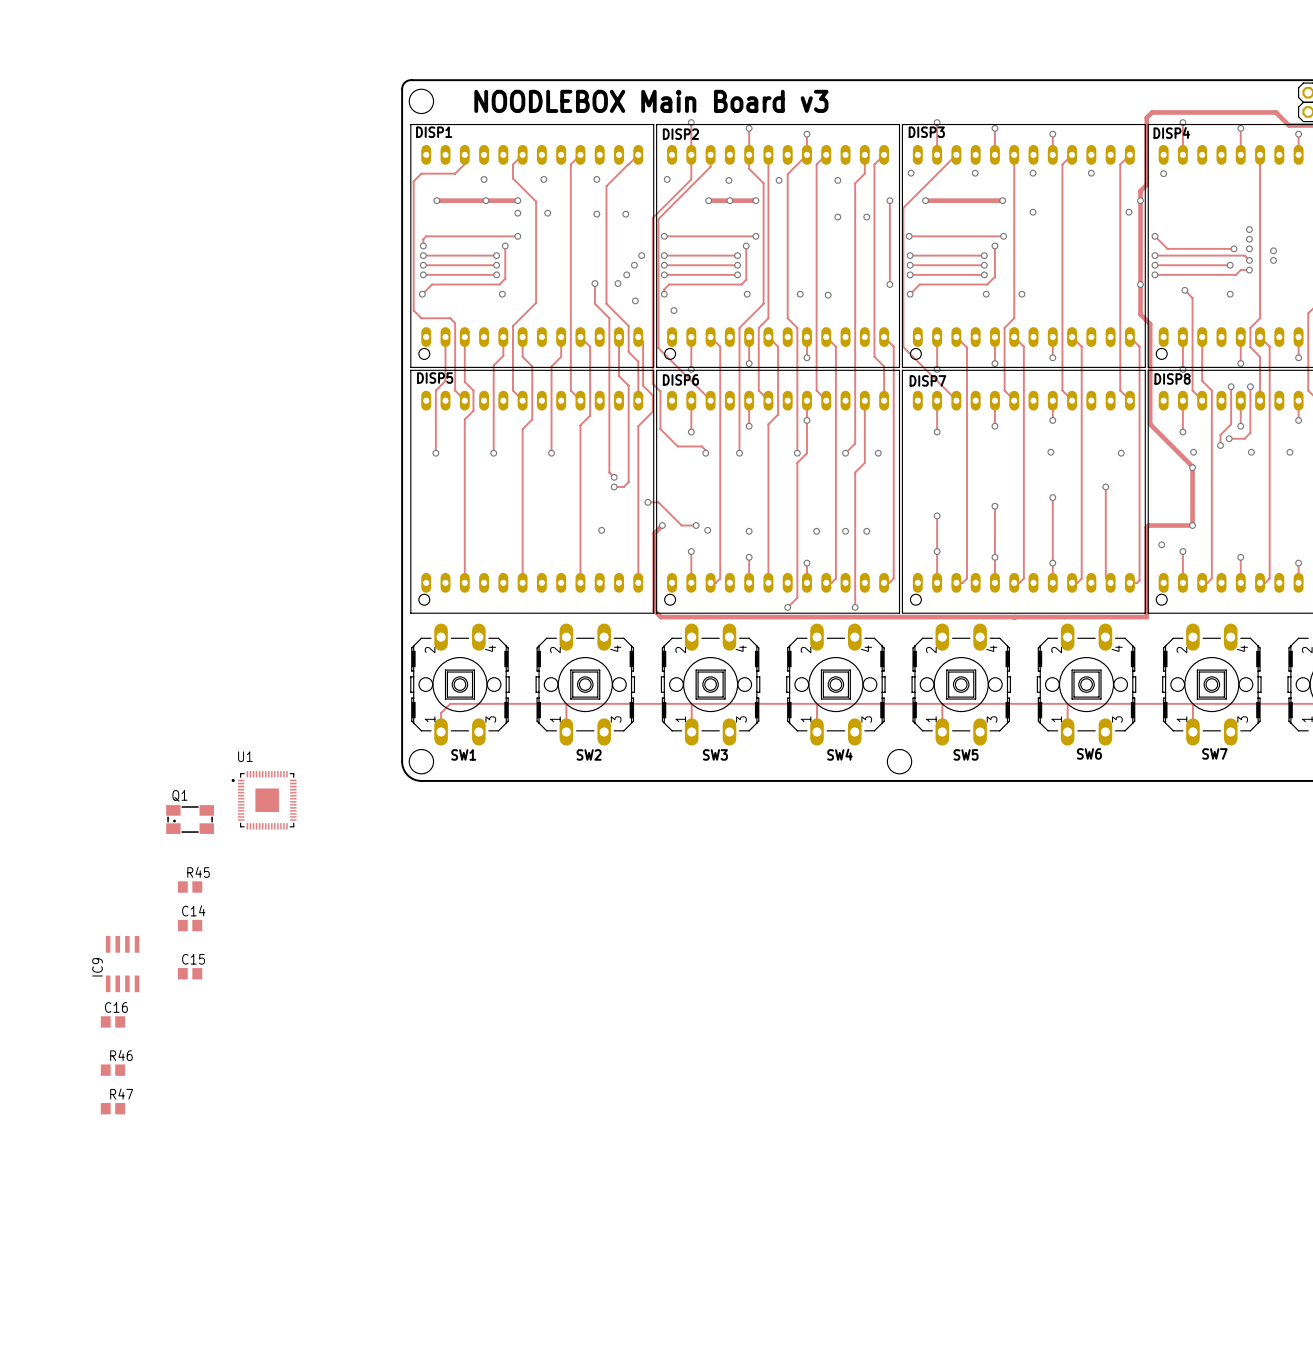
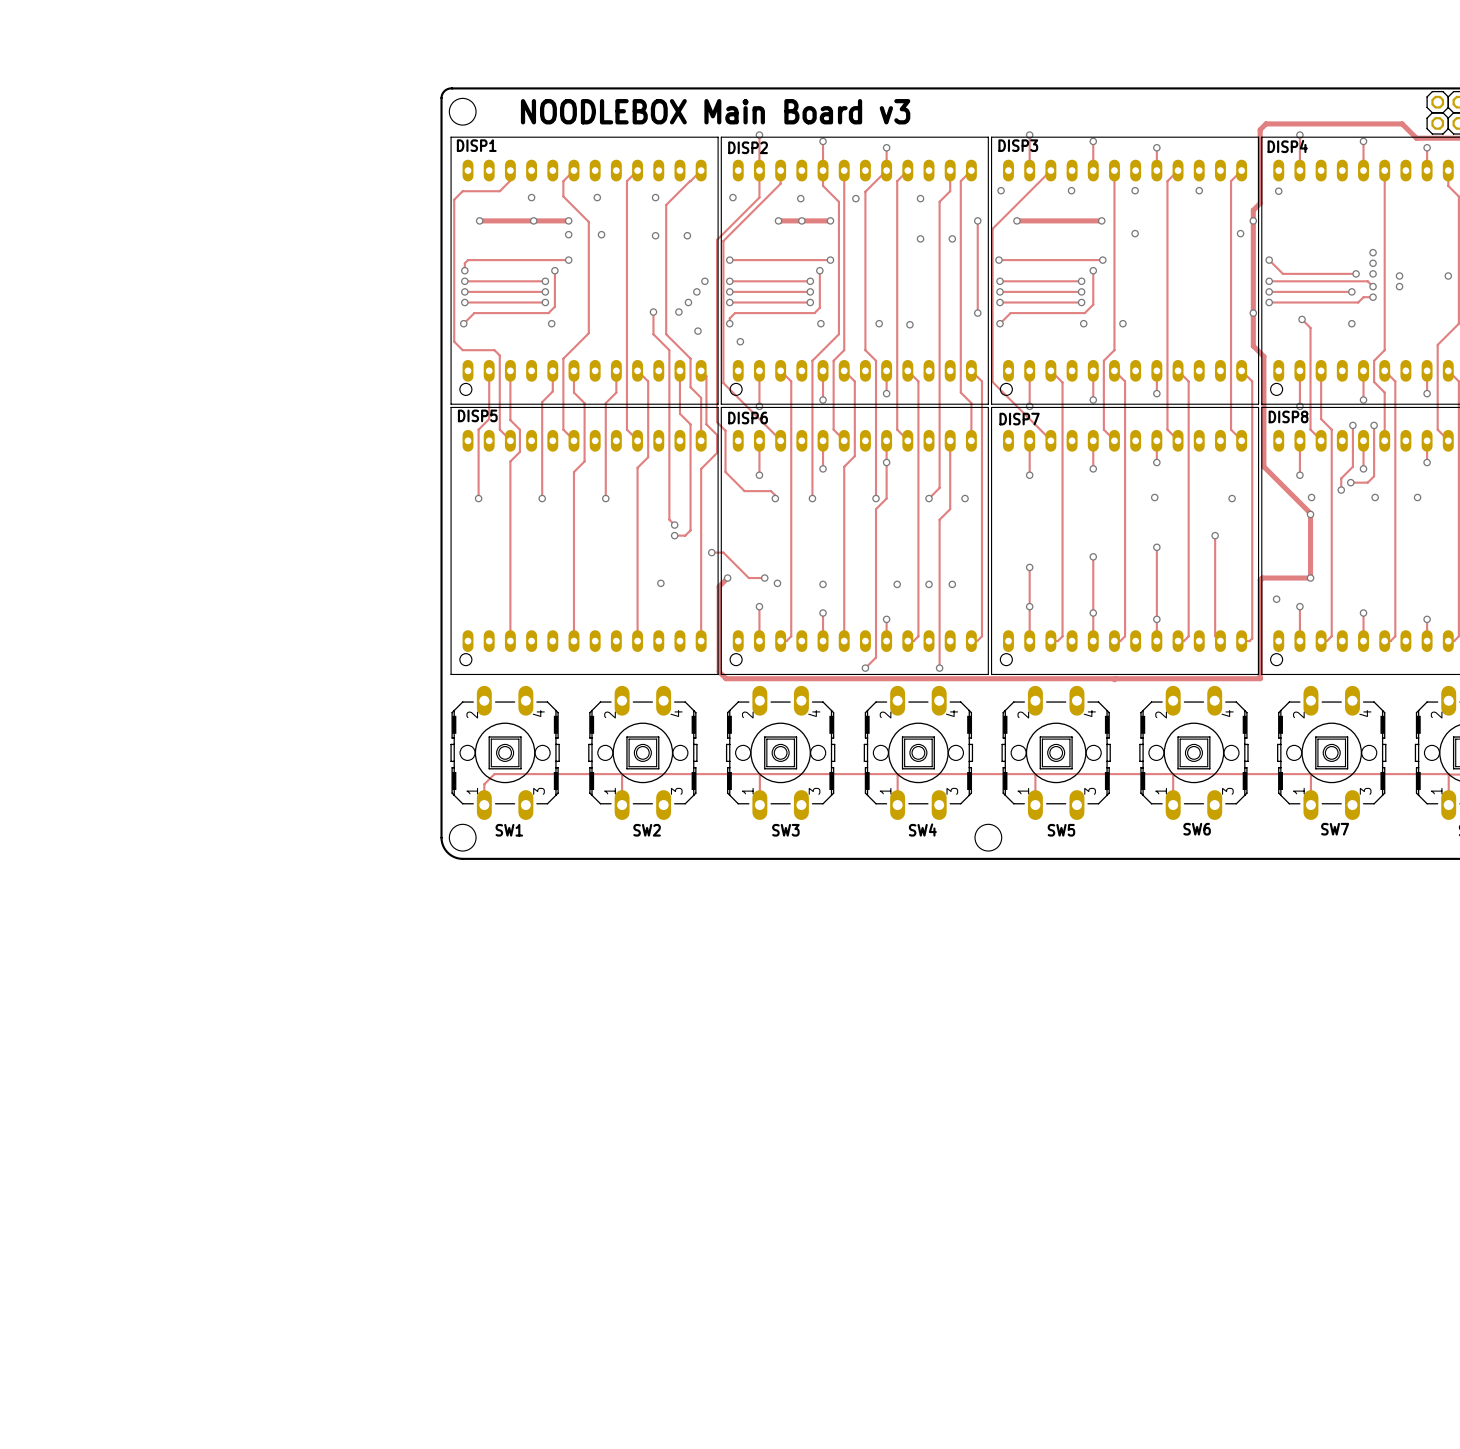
U1: (264, 800) -> none
Q1: (190, 819) -> none
R45: (190, 886) -> none
C14: (190, 925) -> none
IC9: (122, 964) -> none
C15: (190, 973) -> none
C16: (112, 1021) -> none
R46: (112, 1070) -> none
R47: (112, 1108) -> none

